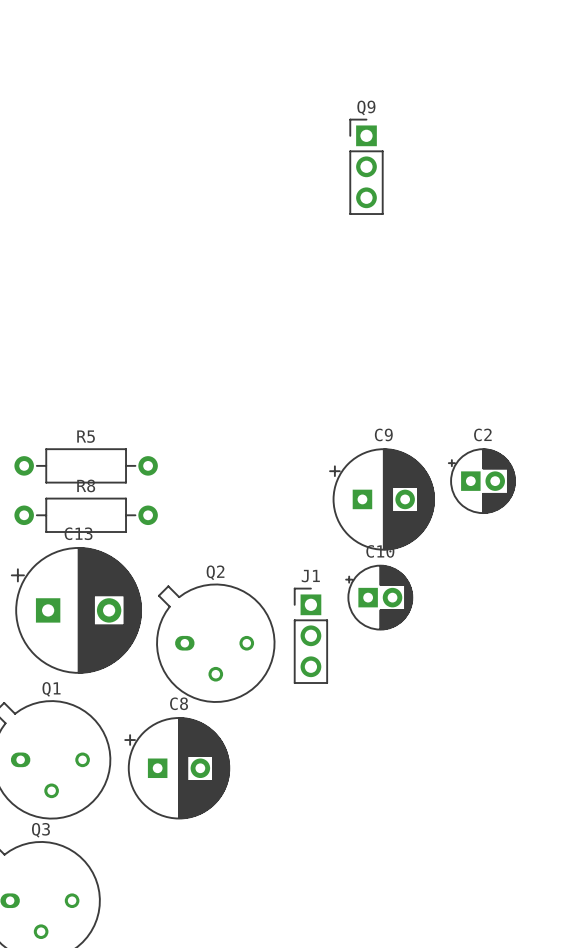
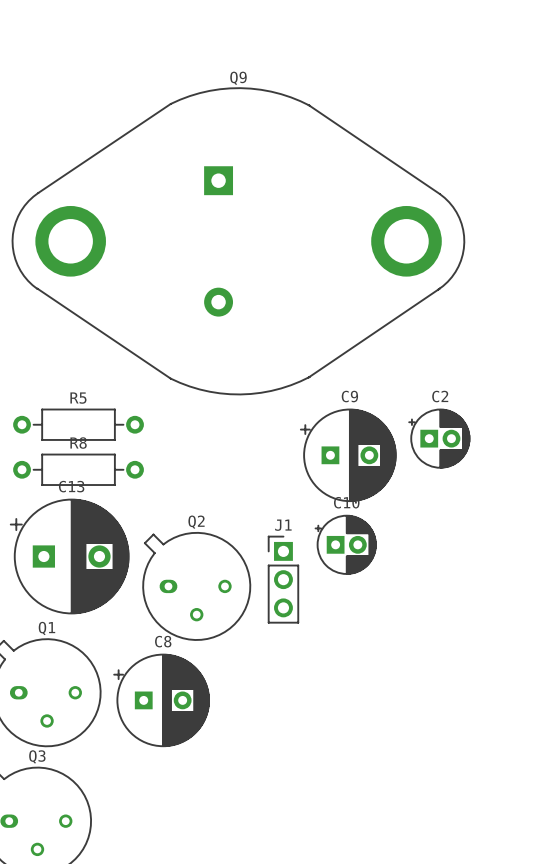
Q9 name position: Q9 (366, 107) -> Q9 (238, 78)
Q9 footprint: [349, 118, 384, 215] -> [11, 87, 465, 396]

